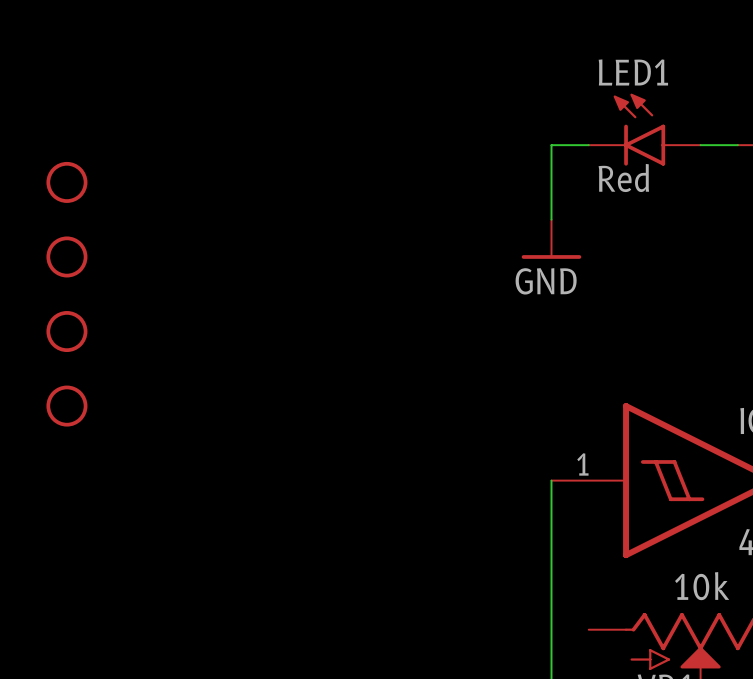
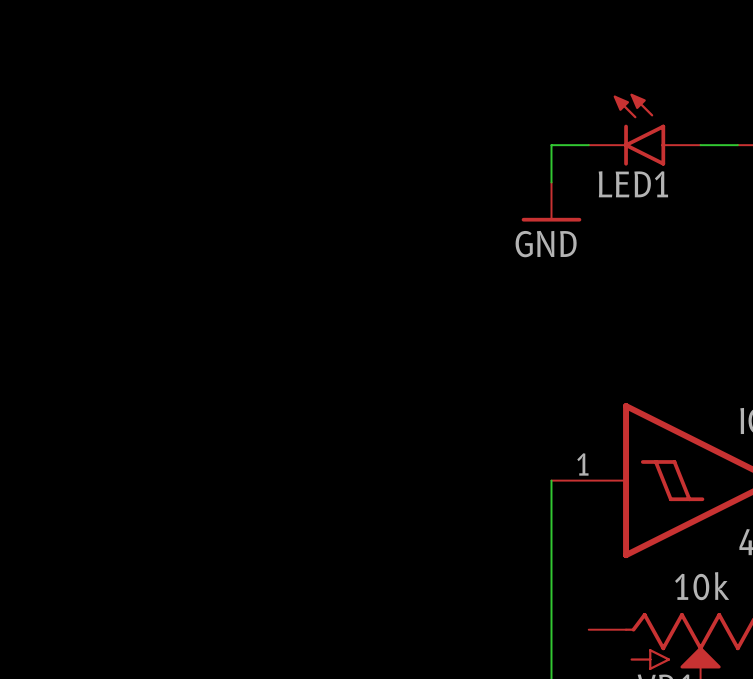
LED1 name position: LED1 (633, 72) -> LED1 (633, 184)
LED1 value: Red (623, 177) -> none
part: (66, 182) -> none
power symbol position: GND (551, 239) -> GND (551, 202)
part: (66, 256) -> none
part: (66, 331) -> none
part: (66, 406) -> none

